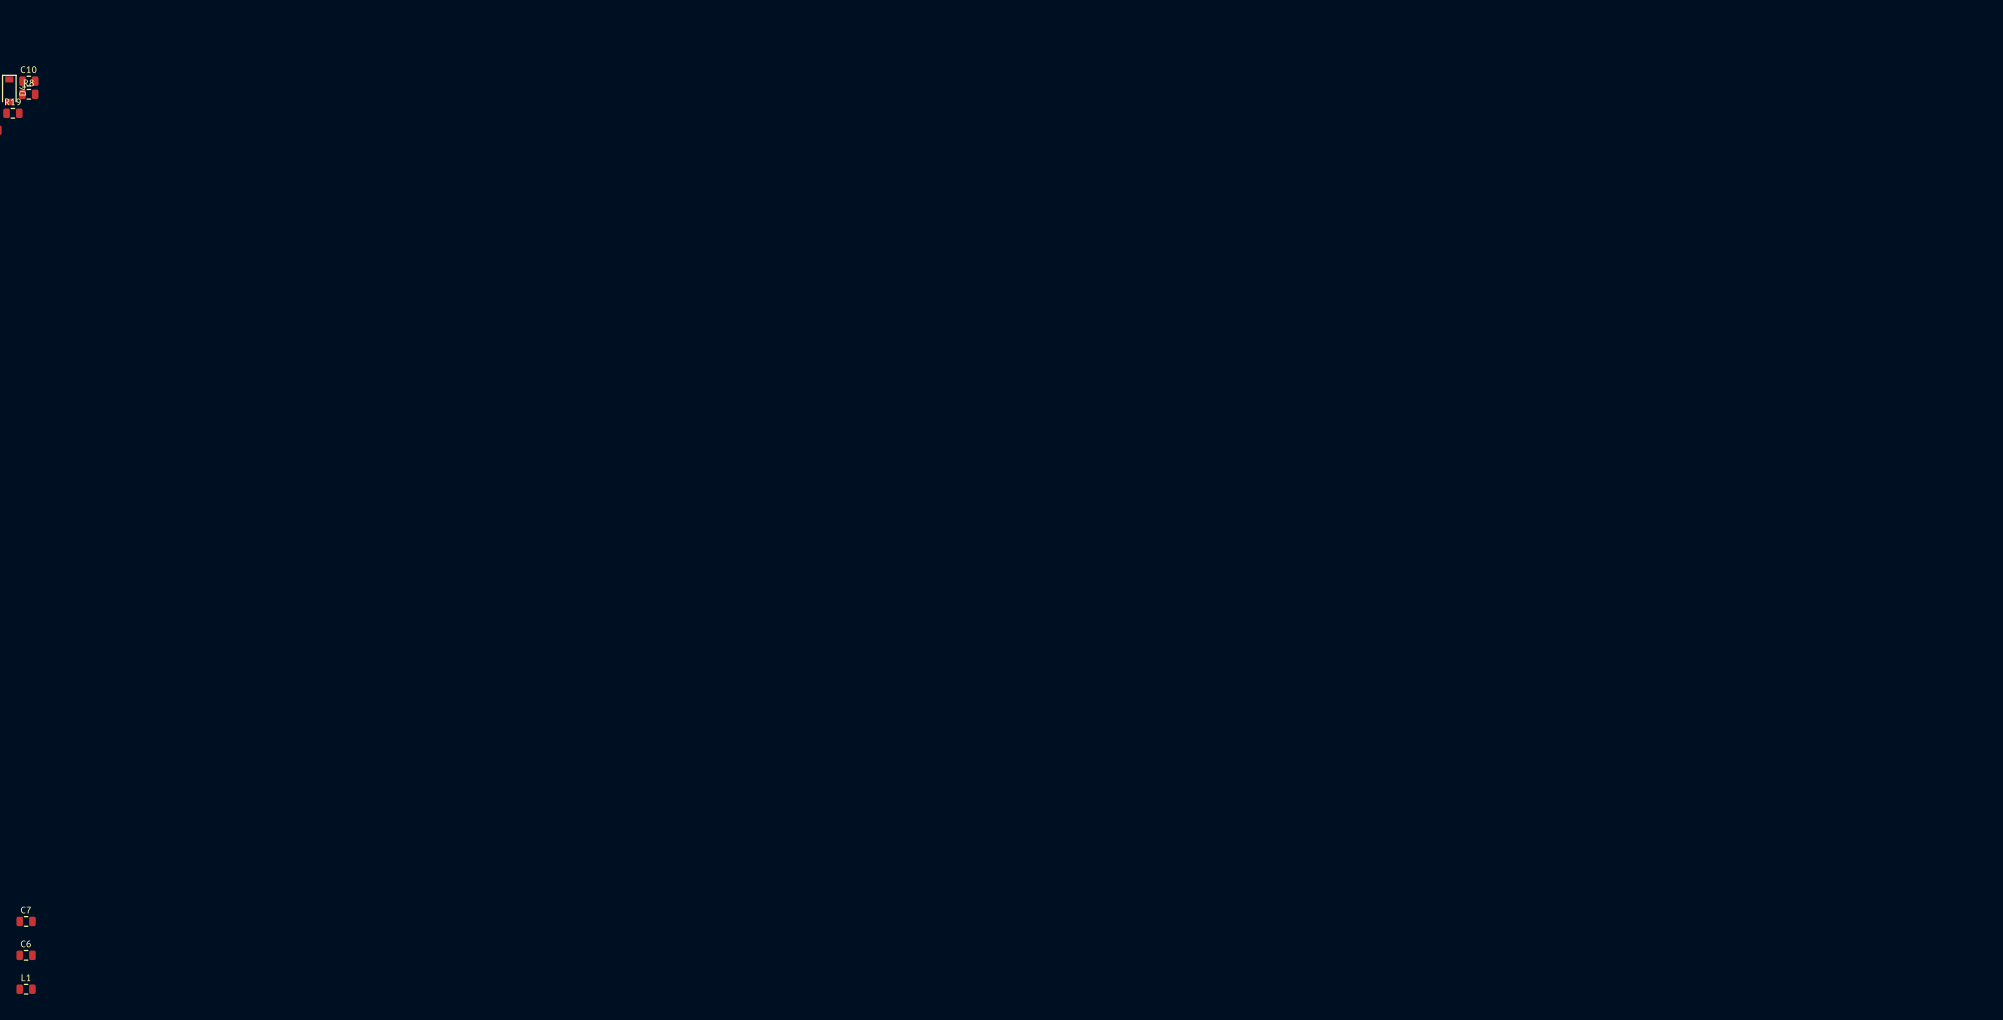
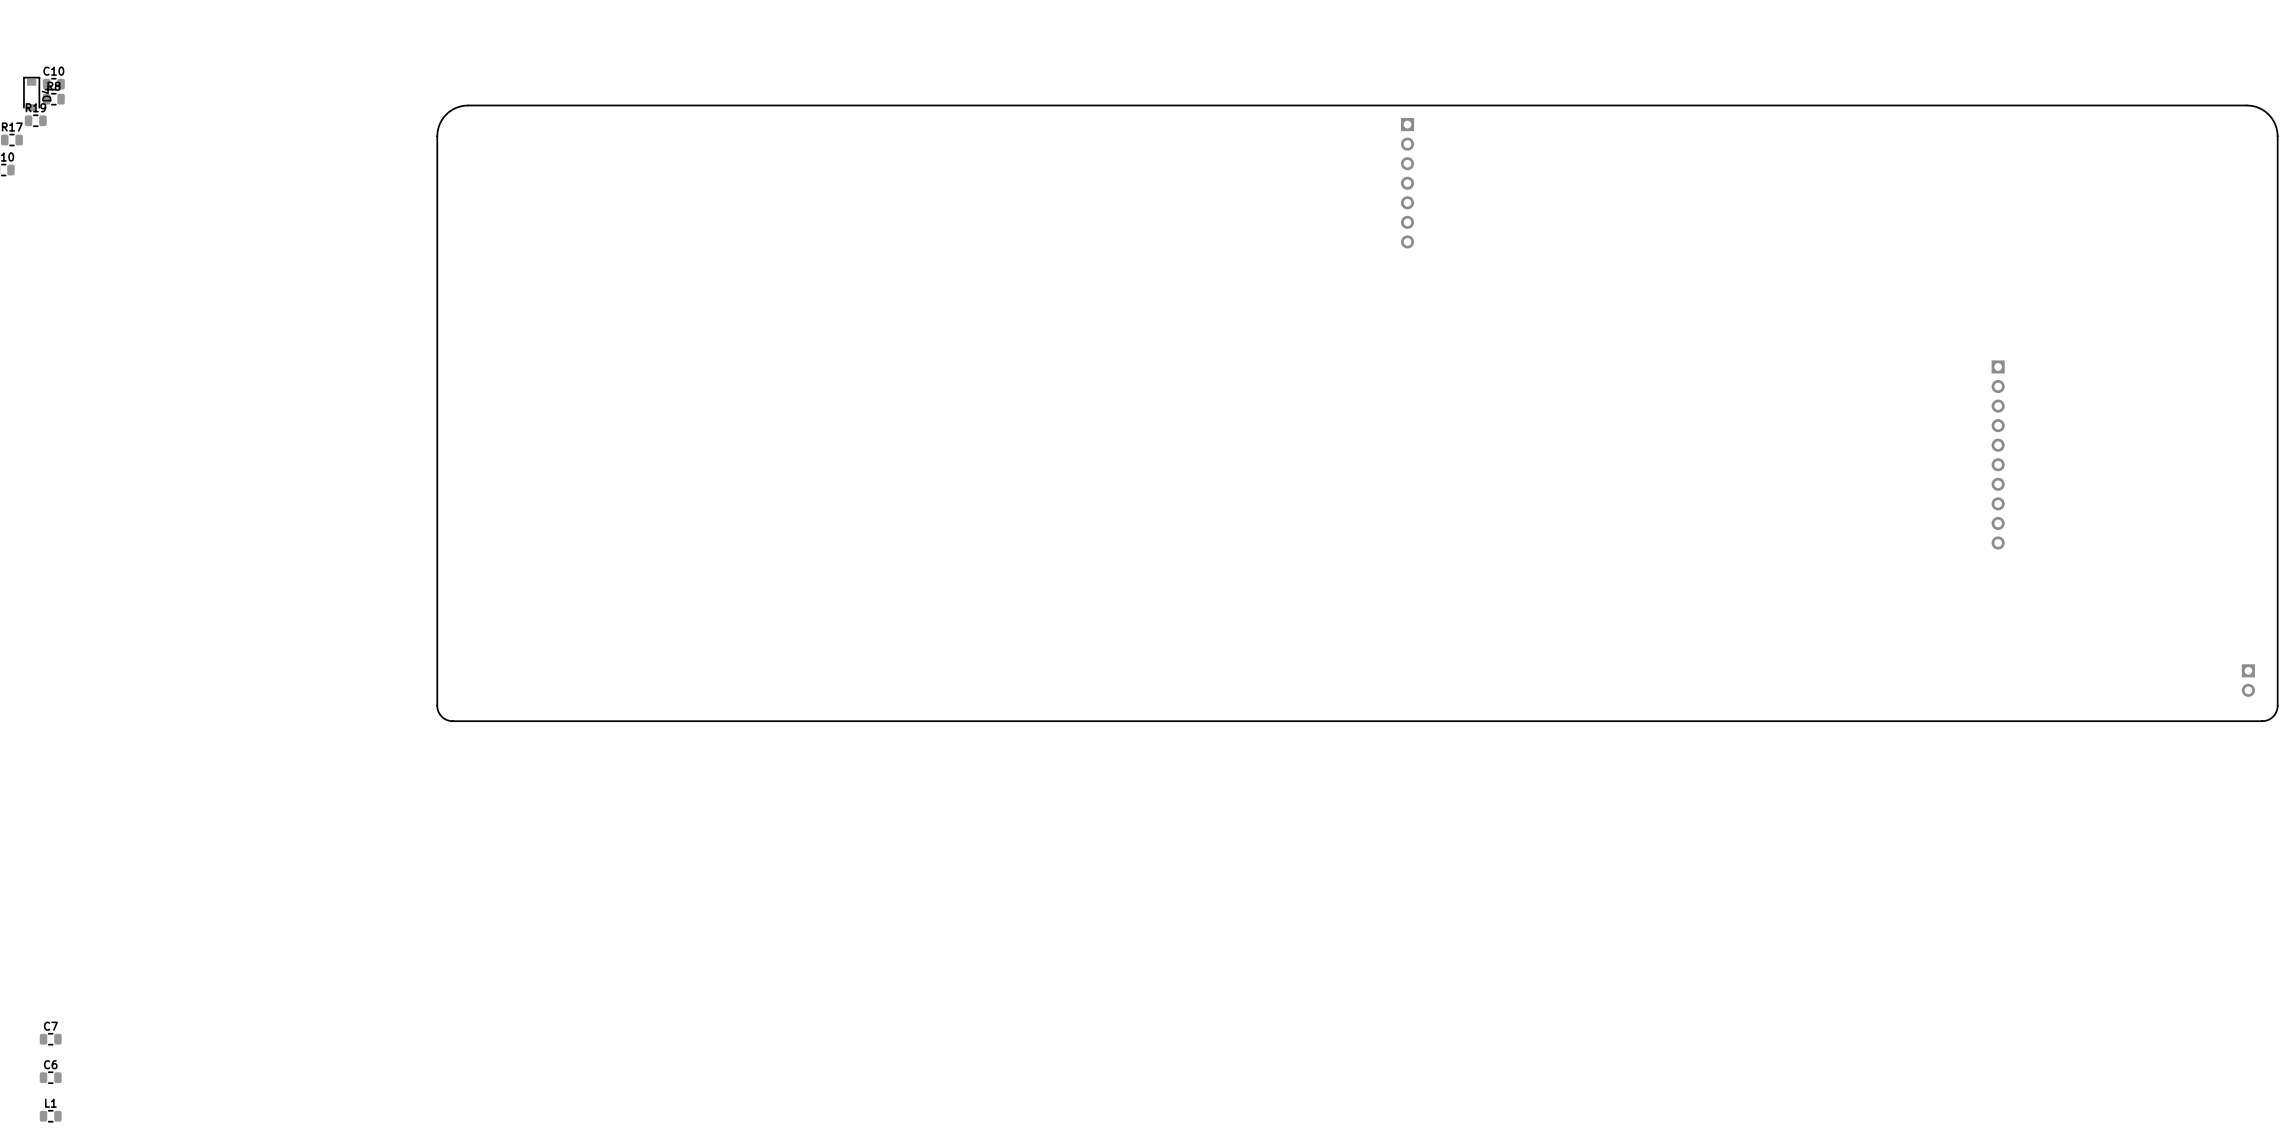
board edge: none -> (468, 105) (2254, 106) (2265, 111) (2271, 117) (2275, 124) (2277, 136) (2277, 709) (2271, 718) (2262, 721) (448, 720) (440, 715) (437, 705) (437, 136) (439, 124) (446, 114) (456, 107) (468, 105)
part: none -> (1407, 183)
part: none -> (1998, 454)
part: none -> (2248, 680)

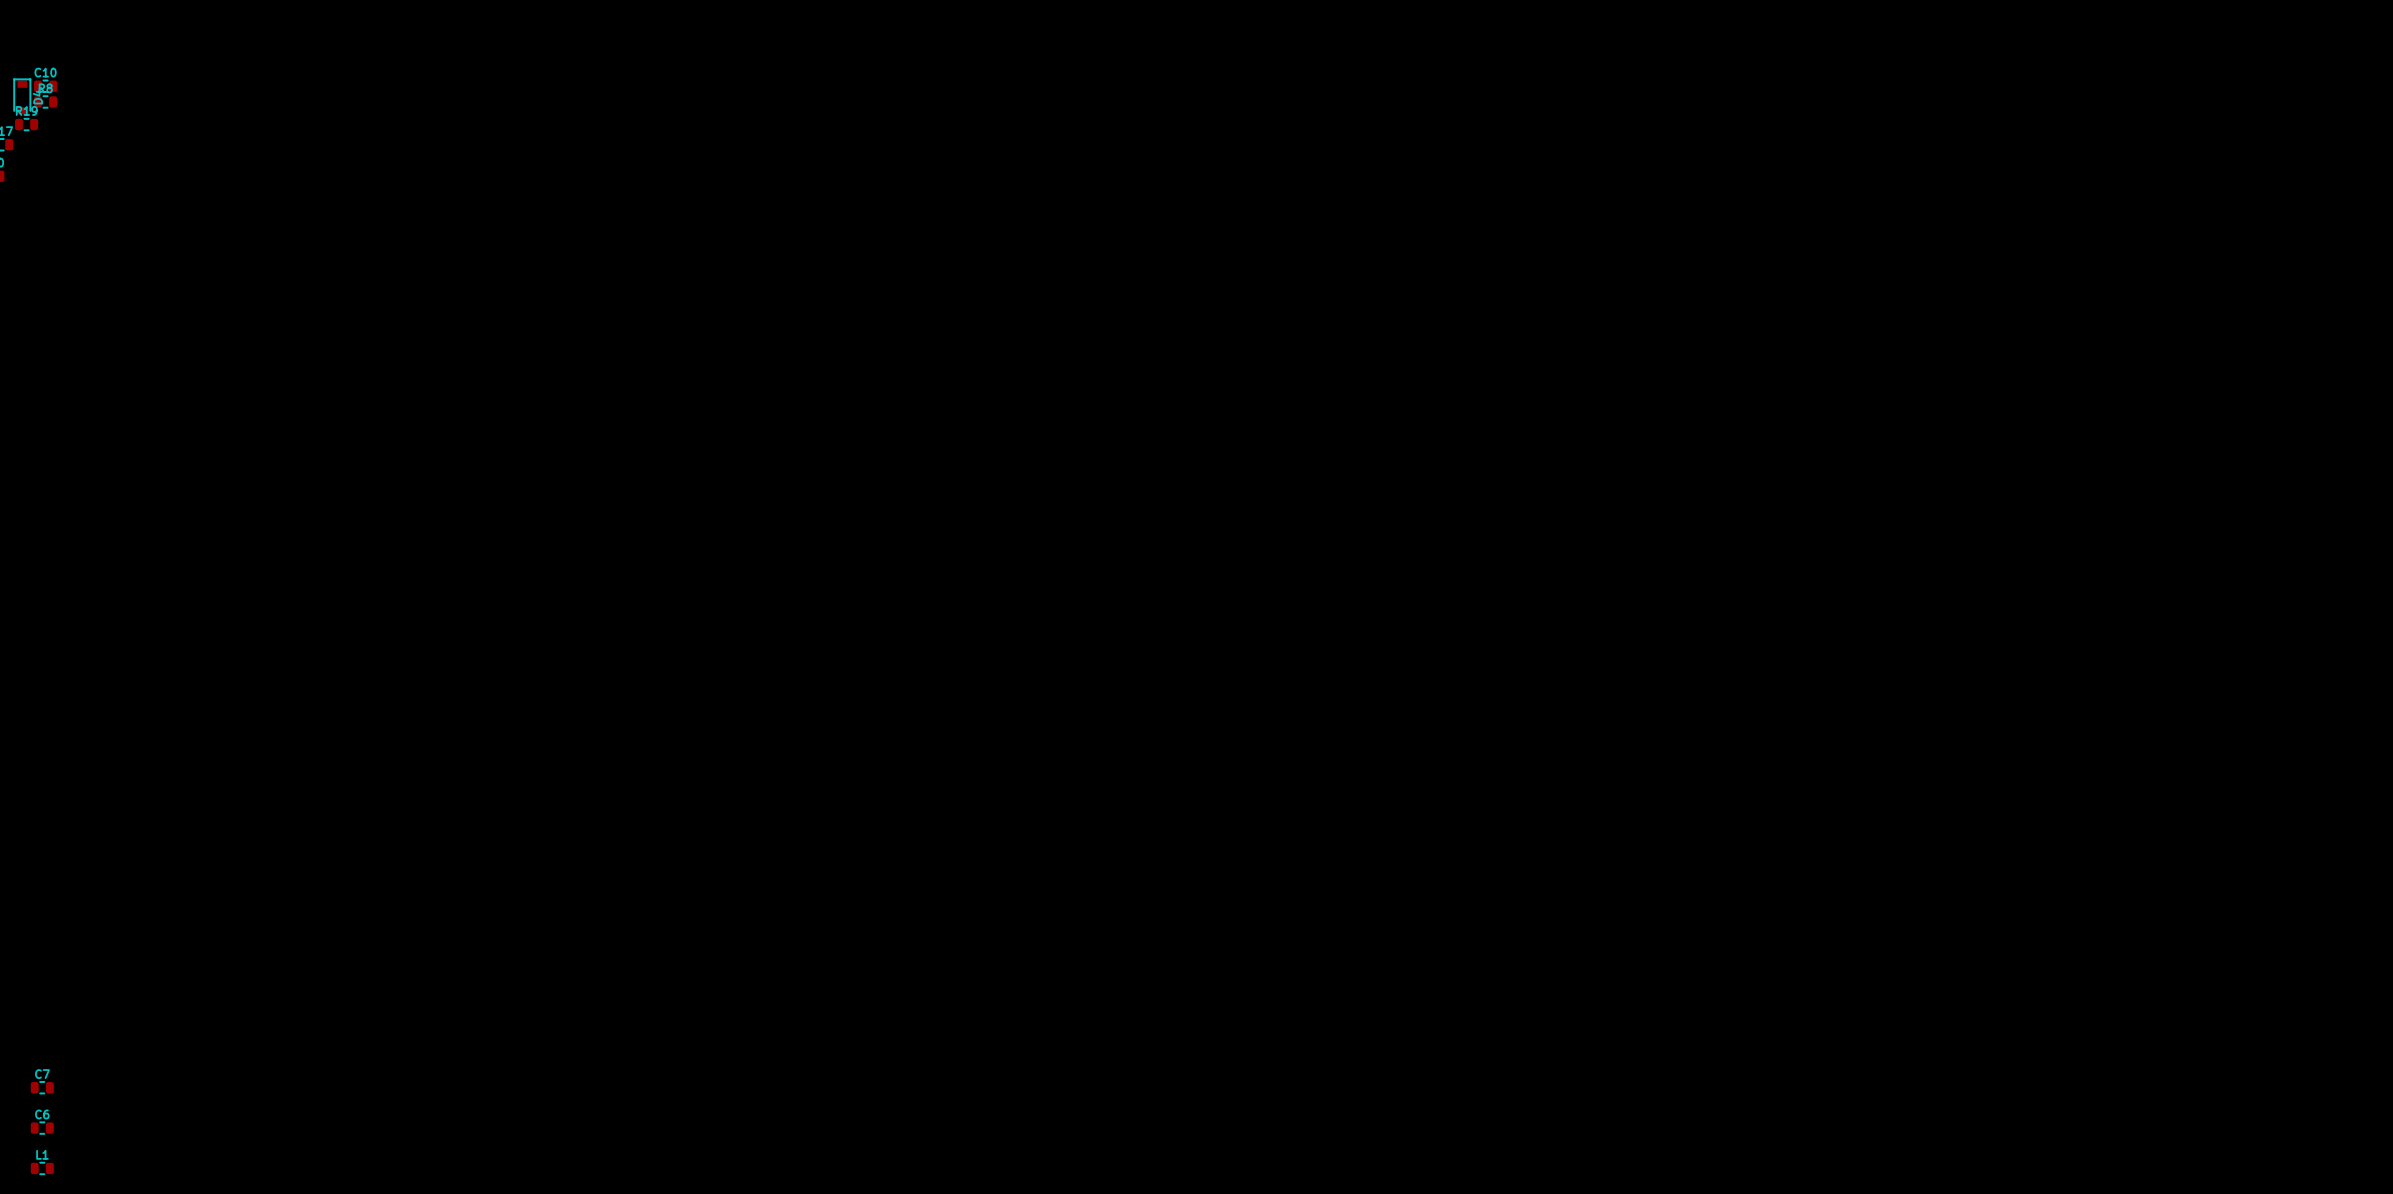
board edge: (468, 105) (2254, 106) (2265, 111) (2271, 117) (2275, 124) (2277, 136) (2277, 709) (2271, 718) (2262, 721) (448, 720) (440, 715) (437, 705) (437, 136) (439, 124) (446, 114) (456, 107) (468, 105) -> none
part: (1407, 183) -> none
part: (1998, 454) -> none
part: (2248, 680) -> none

